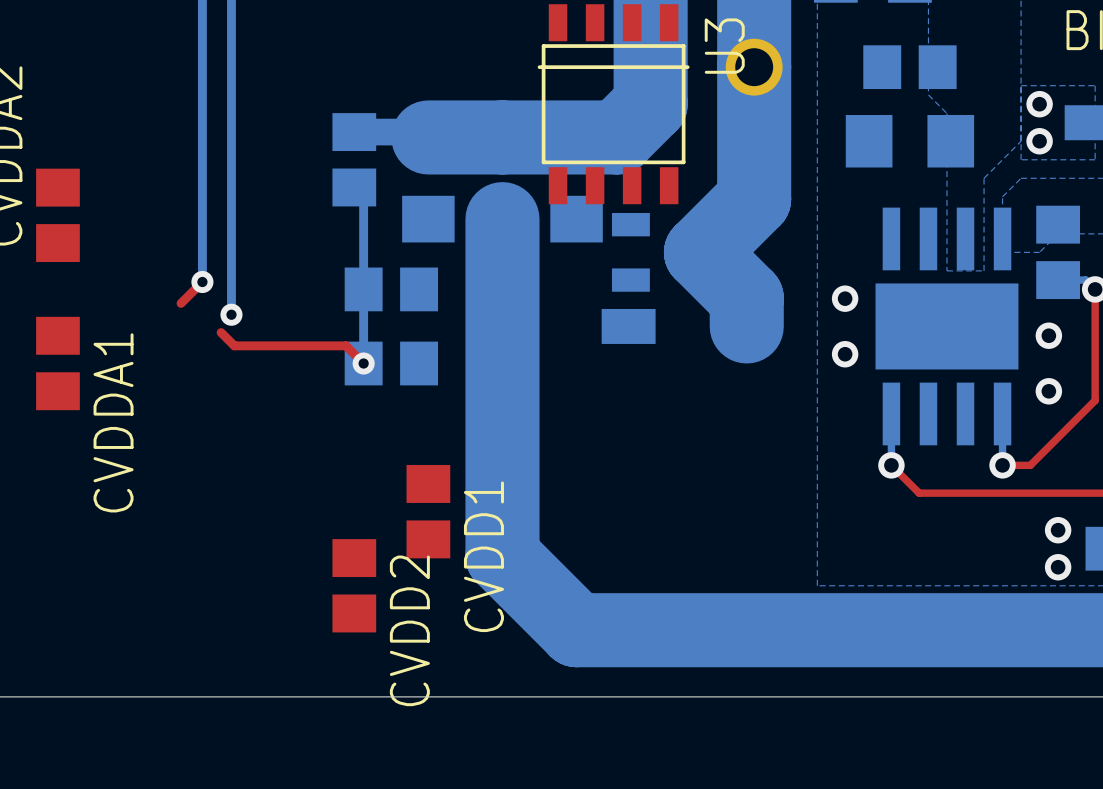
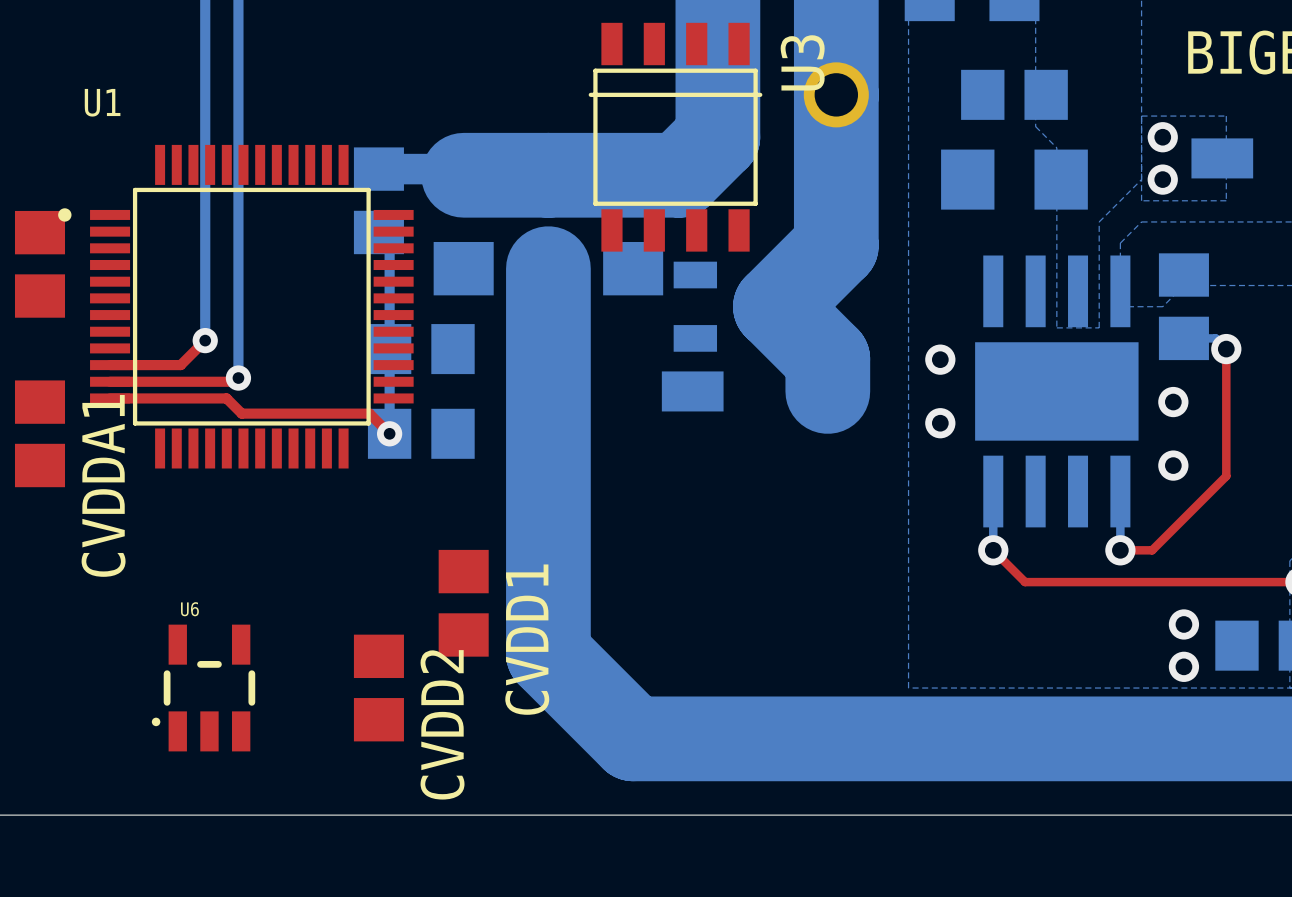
U1: none -> (235, 306)
top track: none -> (110, 365) (180, 365)
top track: none -> (110, 381) (234, 381)
top track: none -> (110, 398) (226, 398)
U6: none -> (203, 688)

